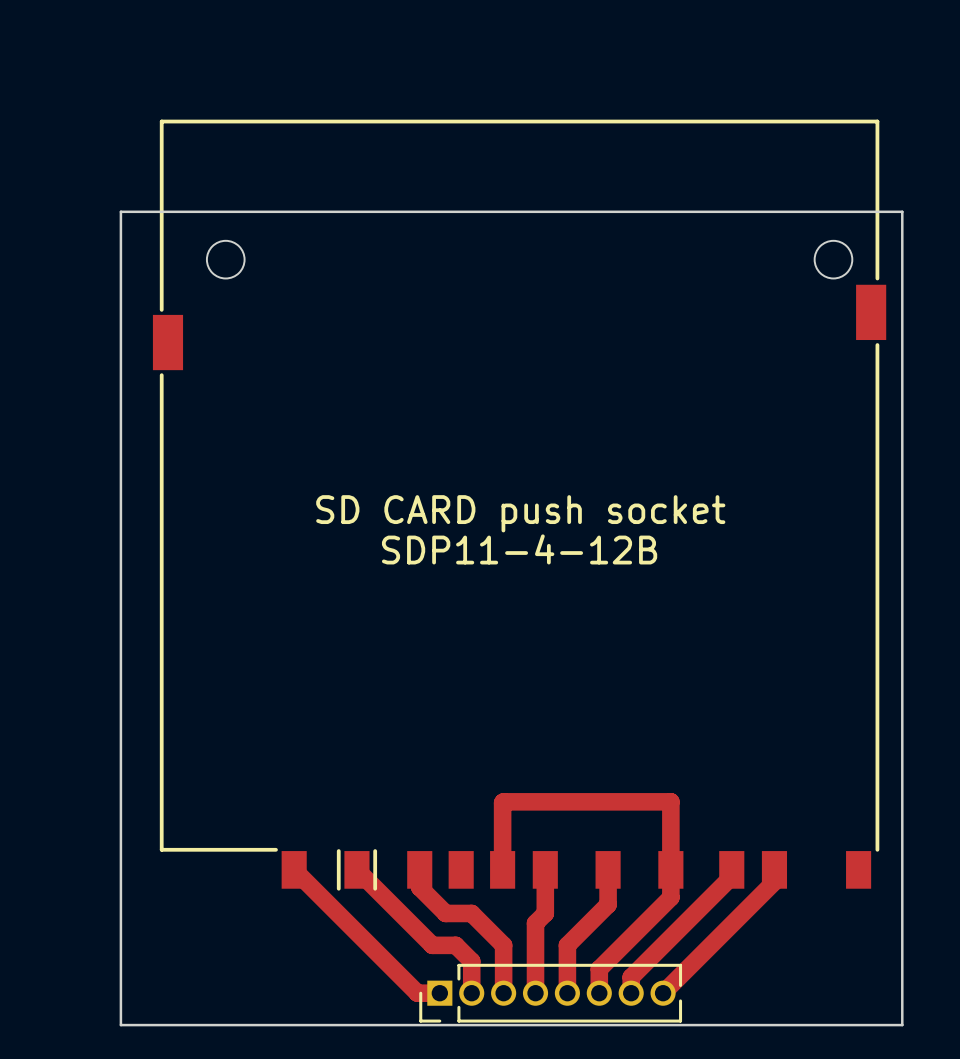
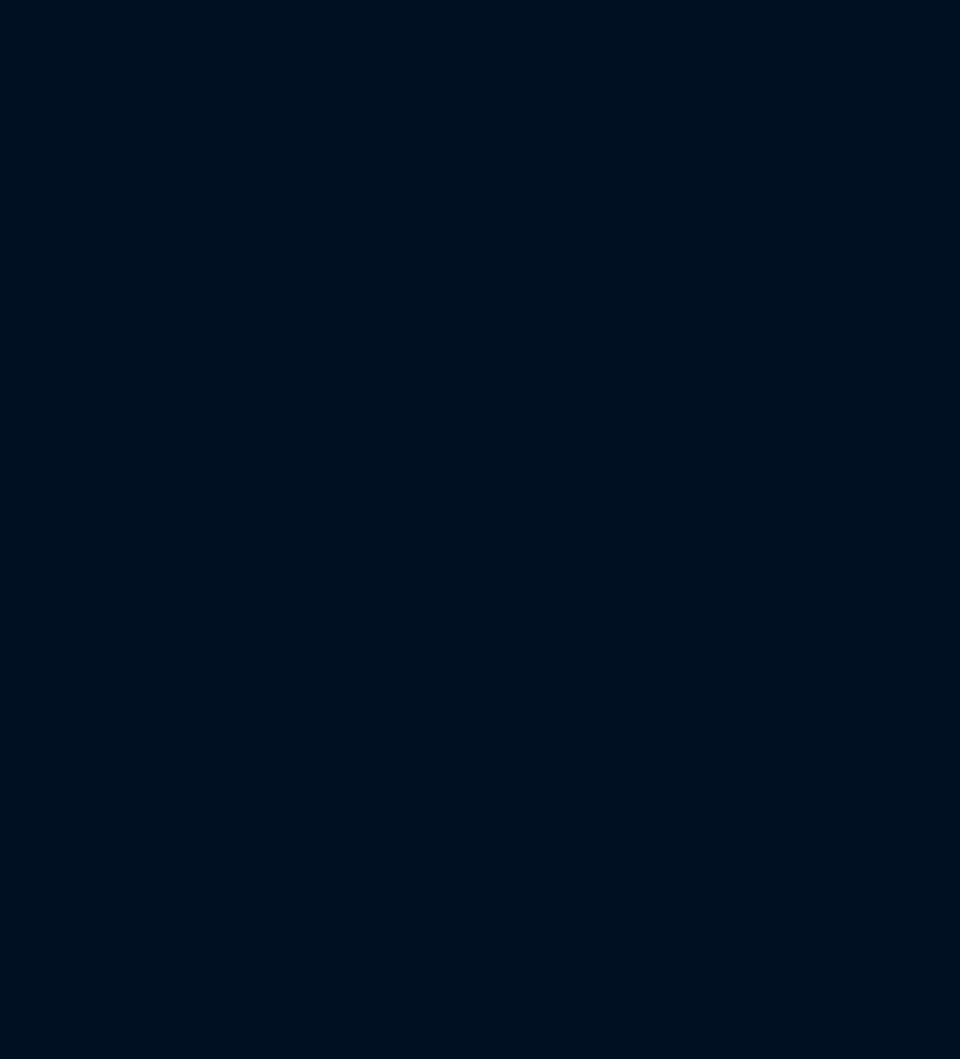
board edge: (120, 211) (902, 211) (902, 1025) (120, 1025) (120, 211) -> none
part: (519, 505) -> none
text: SD CARD push socket (520, 513) -> none
text: SDP11-4-12B (519, 549) -> none
track: (294, 869) (417, 993) (439, 993) -> none
track: (356, 869) (432, 945) (455, 945) (471, 961) (471, 993) -> none
track: (419, 869) (419, 887) (445, 913) (471, 913) (503, 945) (503, 993) -> none
track: (502, 869) (503, 801) (670, 801) (670, 897) (599, 969) (599, 993) -> none
track: (545, 869) (545, 913) (535, 923) (535, 993) -> none
track: (608, 869) (608, 904) (567, 945) (567, 993) -> none
track: (731, 869) (731, 876) (631, 977) (631, 993) -> none
track: (774, 869) (774, 881) (663, 993) -> none
part: (550, 993) -> none

